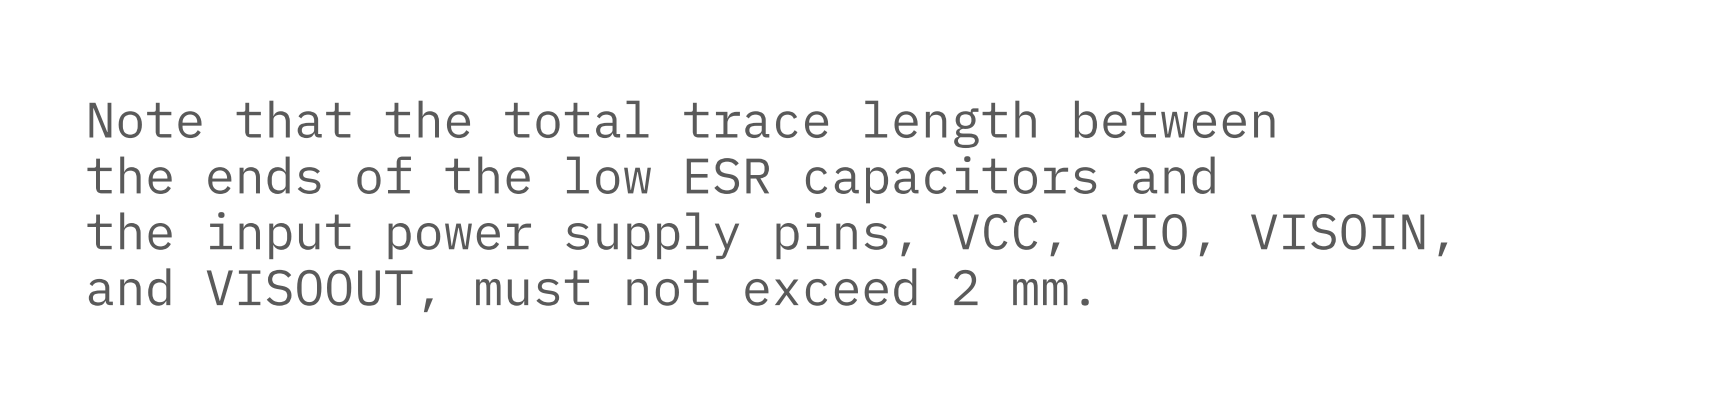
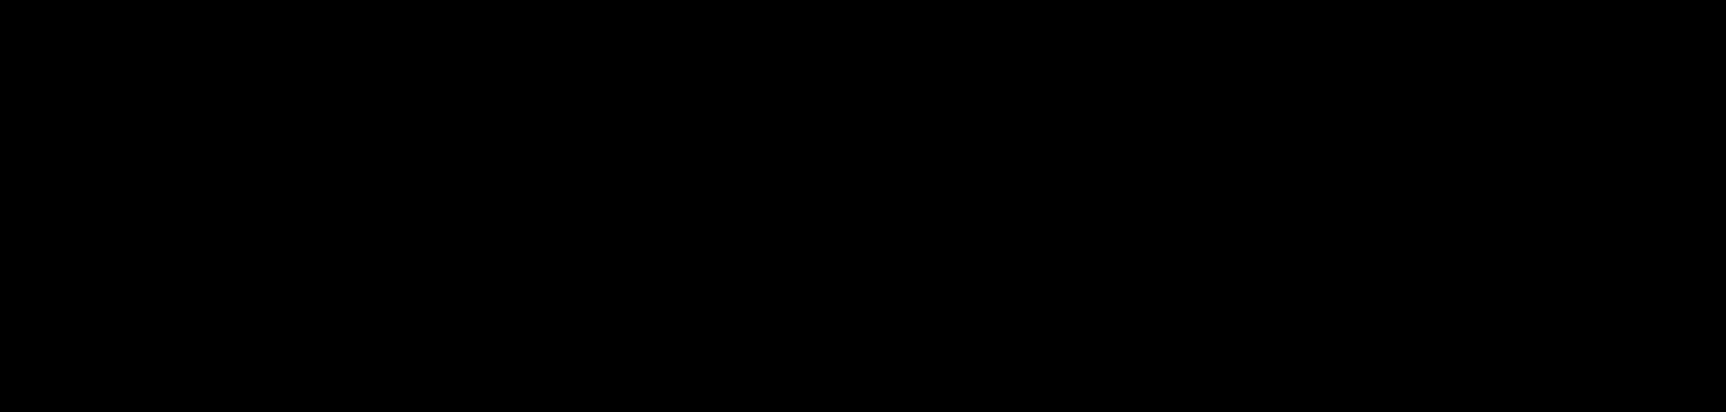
text: Note that the total trace length between (681, 124) -> none
text: the ends of the low ESR capacitors and (651, 179) -> none
text: the input power supply pins, VCC, VIO, VISOIN, (767, 235) -> none
text: and VISOOUT, must not exceed 2 mm. (588, 290) -> none

